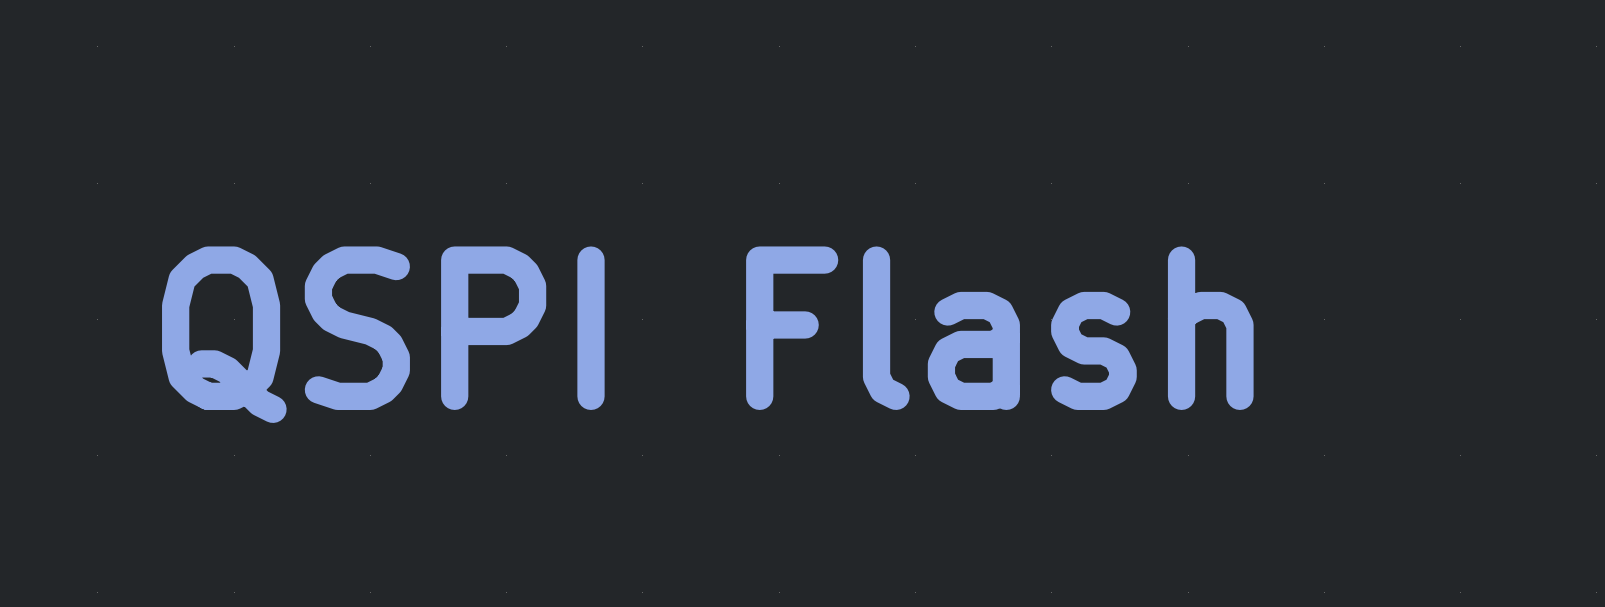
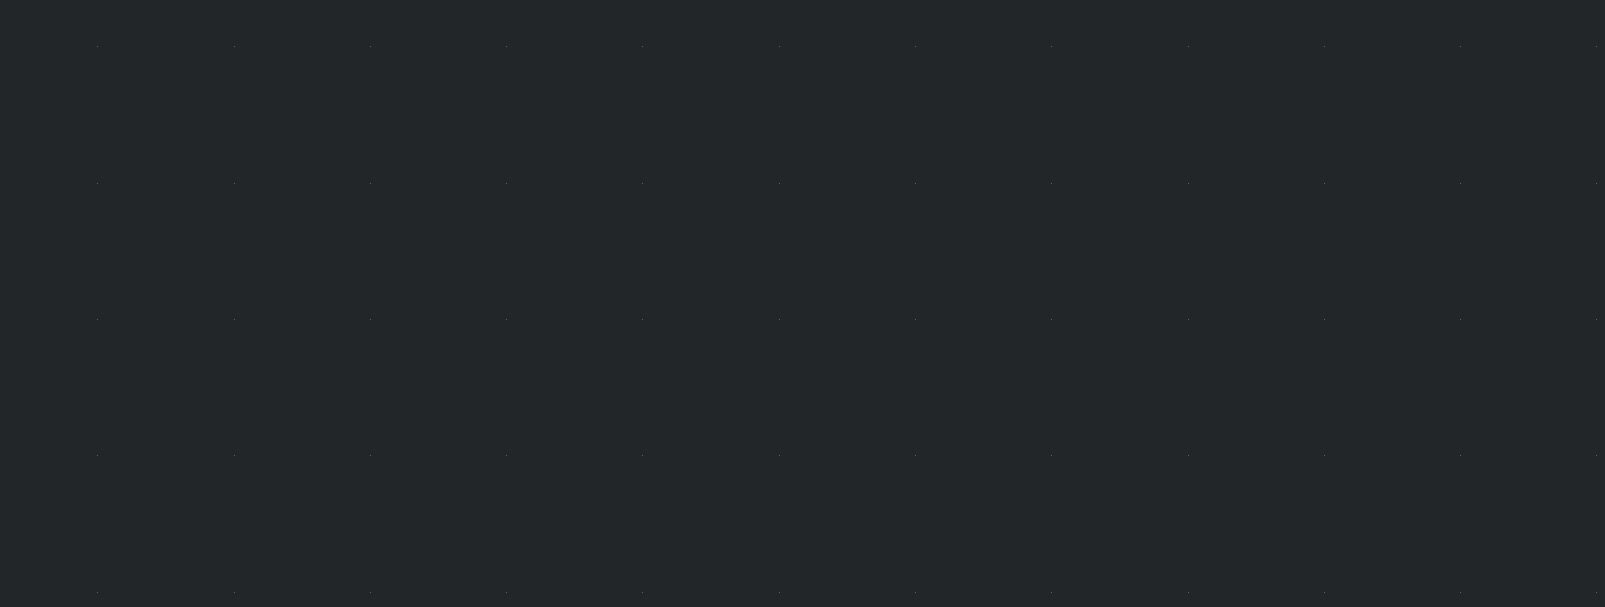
text: QSPI Flash (707, 334) -> none

